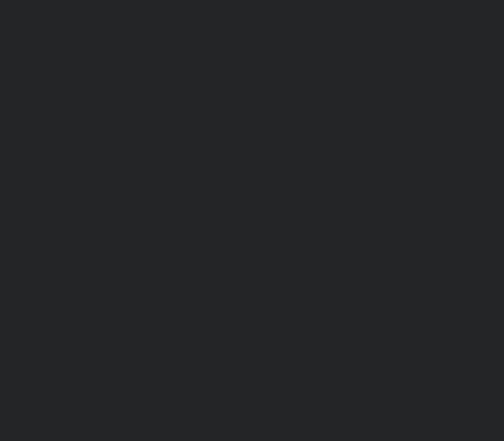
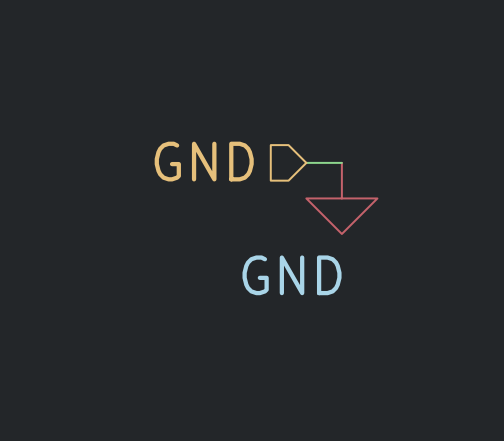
hierarchical label: none -> GND (204, 161)
wire: none -> (306, 162) (341, 162)
power symbol: none -> GND (341, 198)

